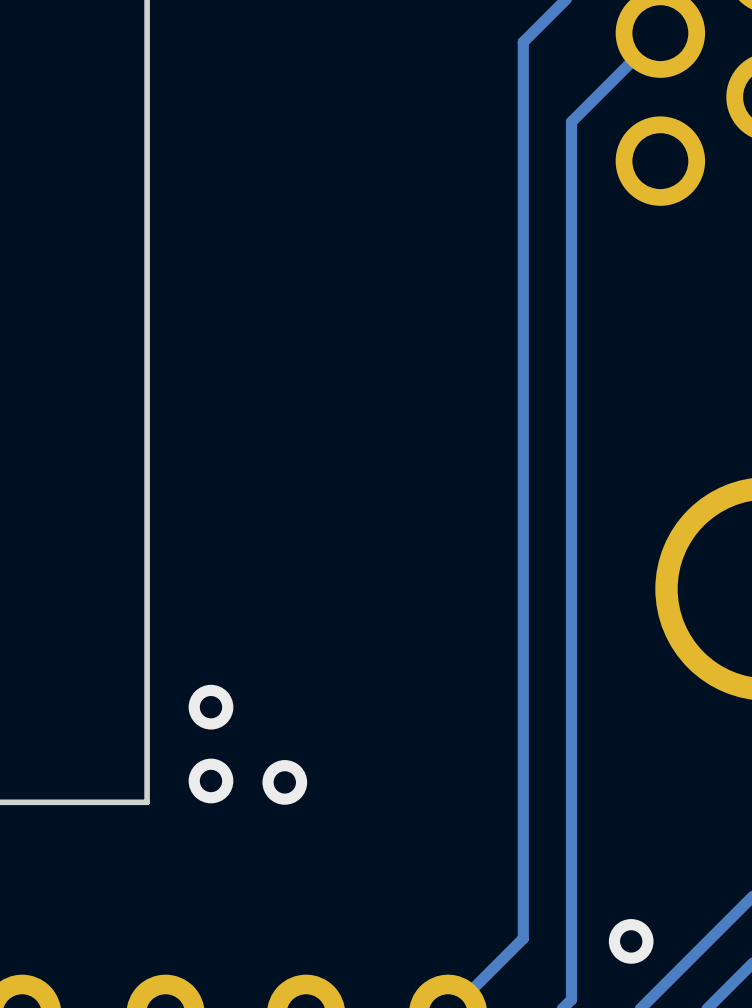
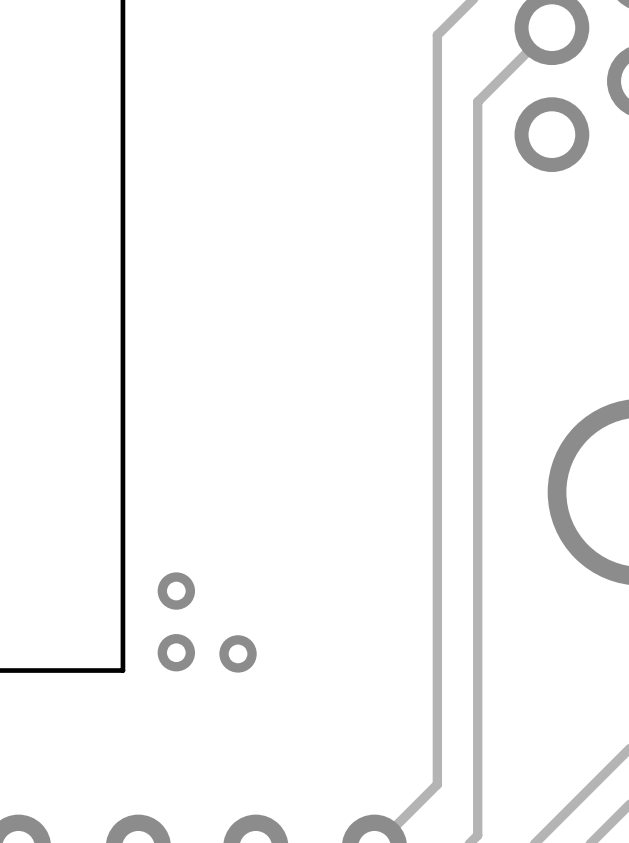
via: (631, 941) -> none

